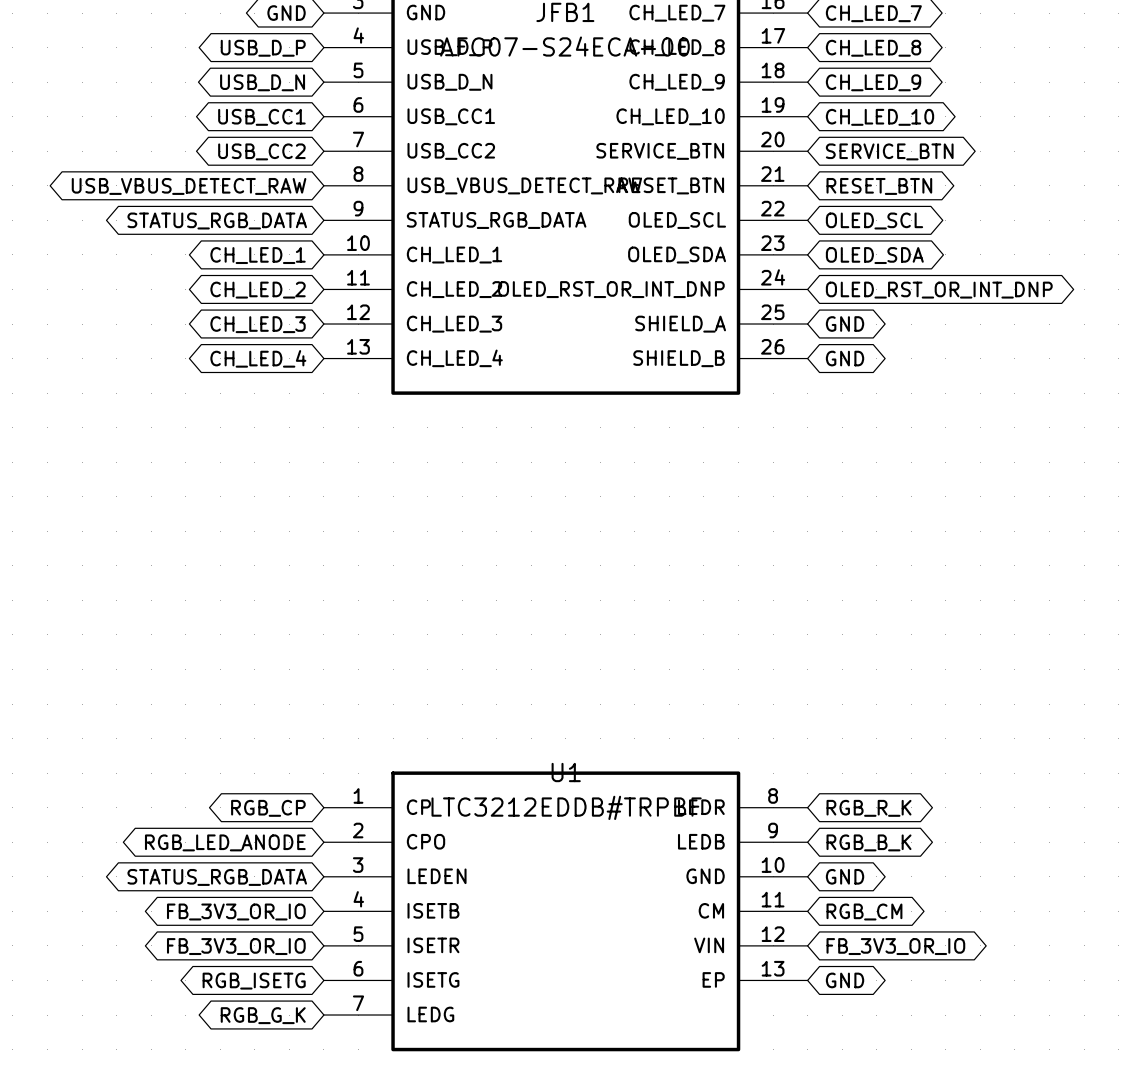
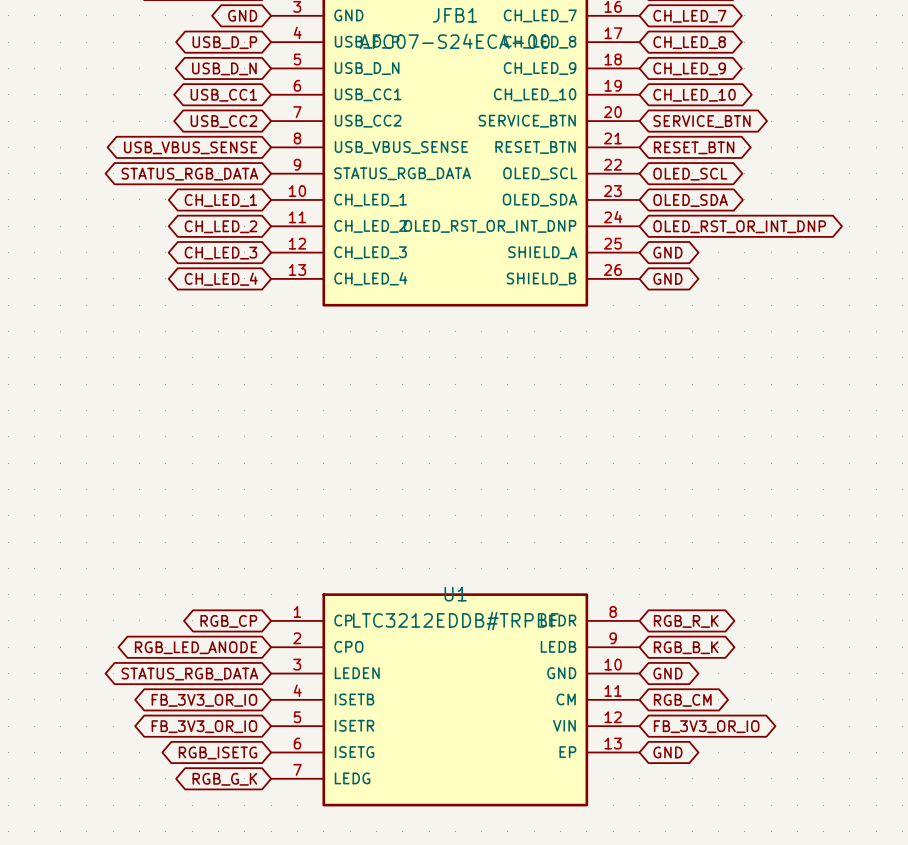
JFB1 pin name: USB_VBUS_DETECT_RAW (524, 185) -> USB_VBUS_SENSE (401, 147)
global label: USB_VBUS_DETECT_RAW (189, 186) -> USB_VBUS_SENSE (190, 147)

